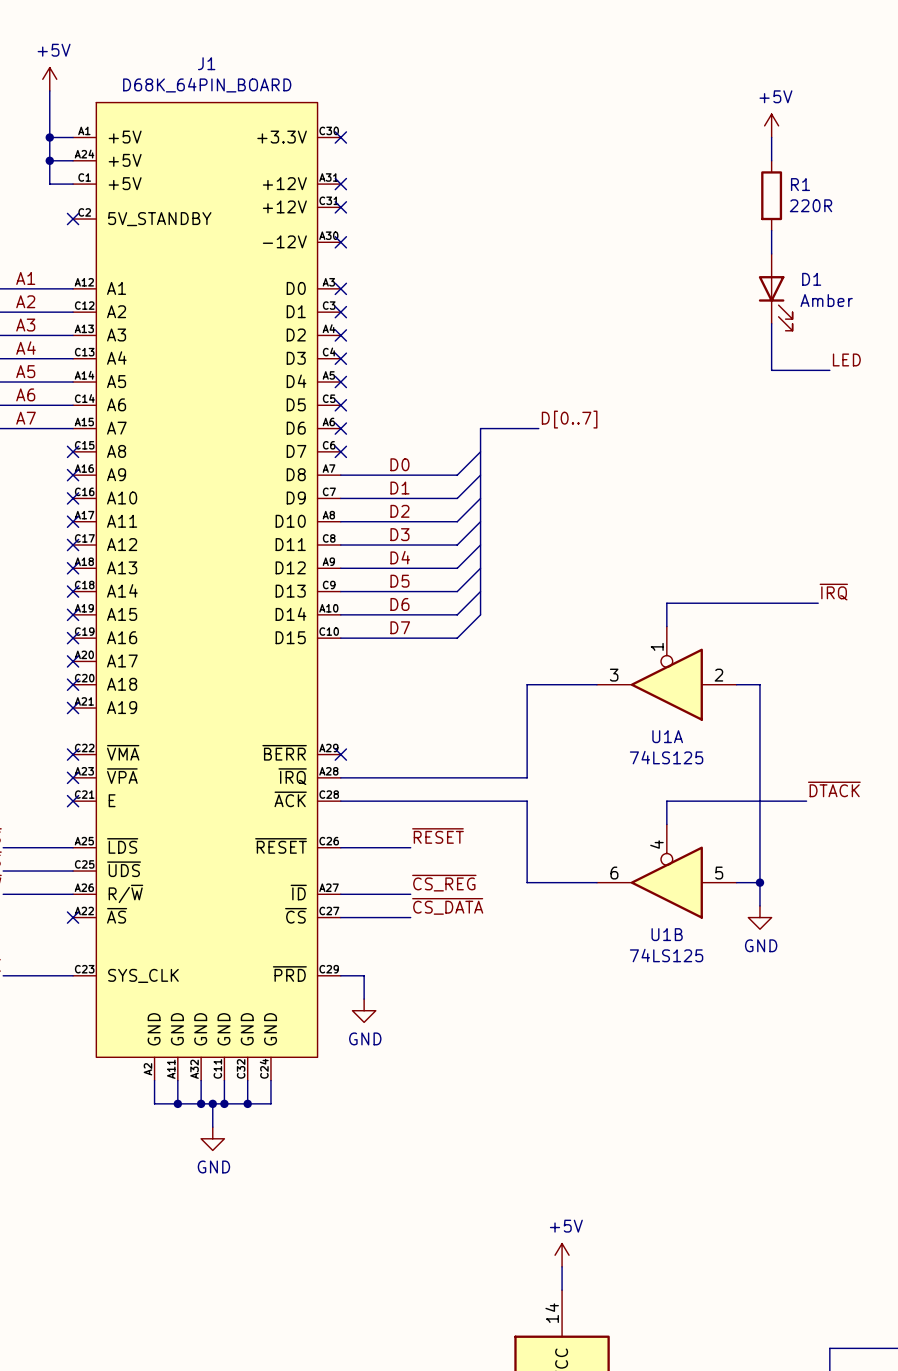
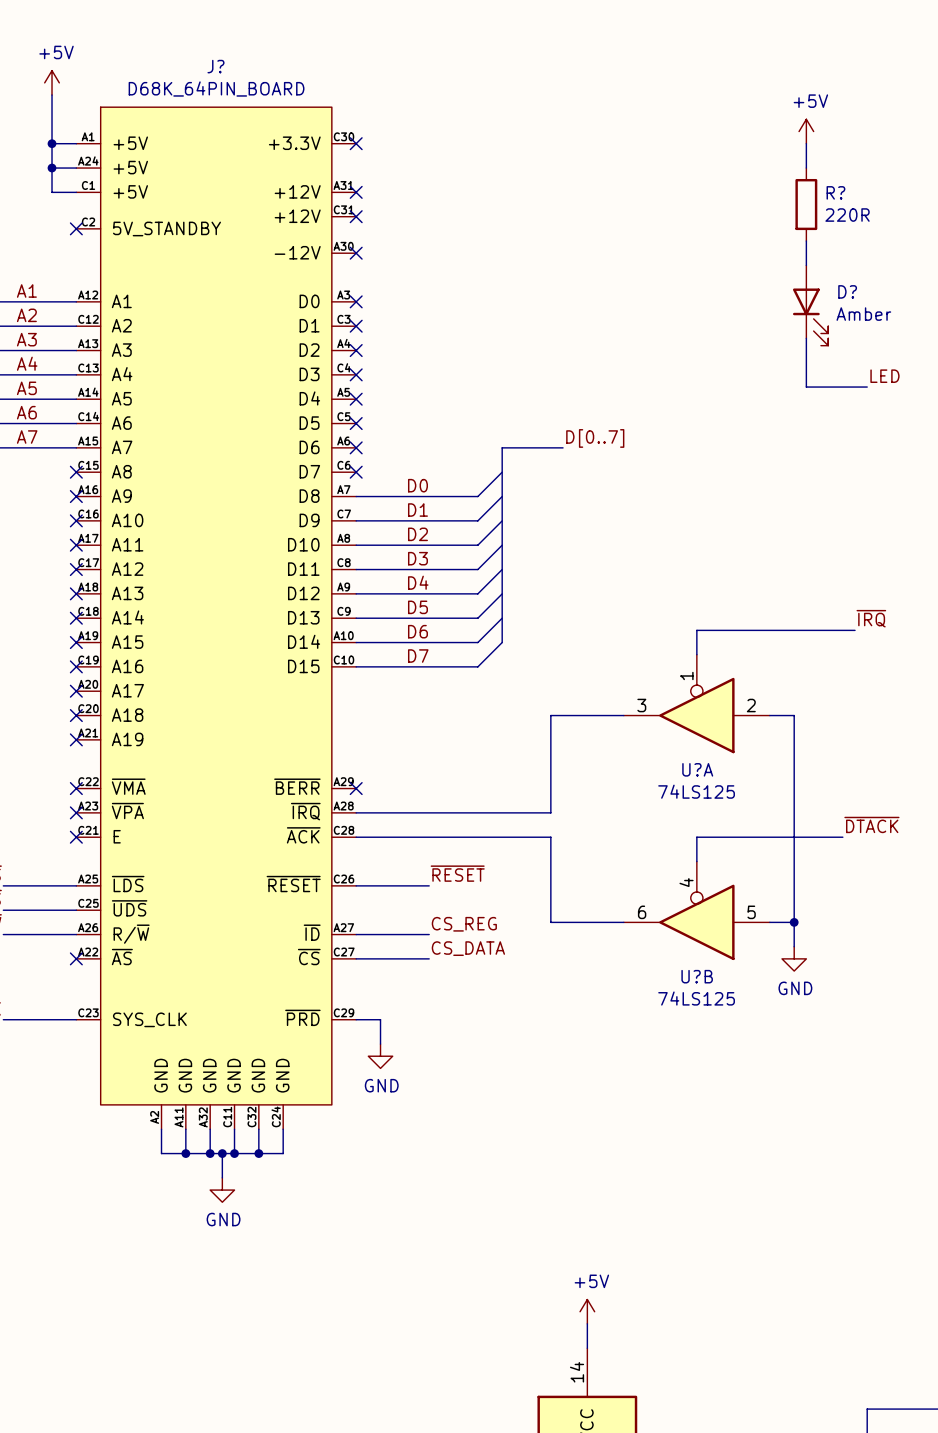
J1 name: J1 (206, 63) -> J? (215, 66)
R1 name: R1 (800, 184) -> R? (835, 192)
D1 name: D1 (811, 279) -> D? (847, 291)
U1A name: U1A (667, 736) -> U?A (697, 769)
label: ~{CS_REG} (444, 883) -> CS_REG (464, 924)
label: ~{CS_DATA} (447, 906) -> CS_DATA (468, 948)
U1B name: U1B (667, 934) -> U?B (697, 976)

